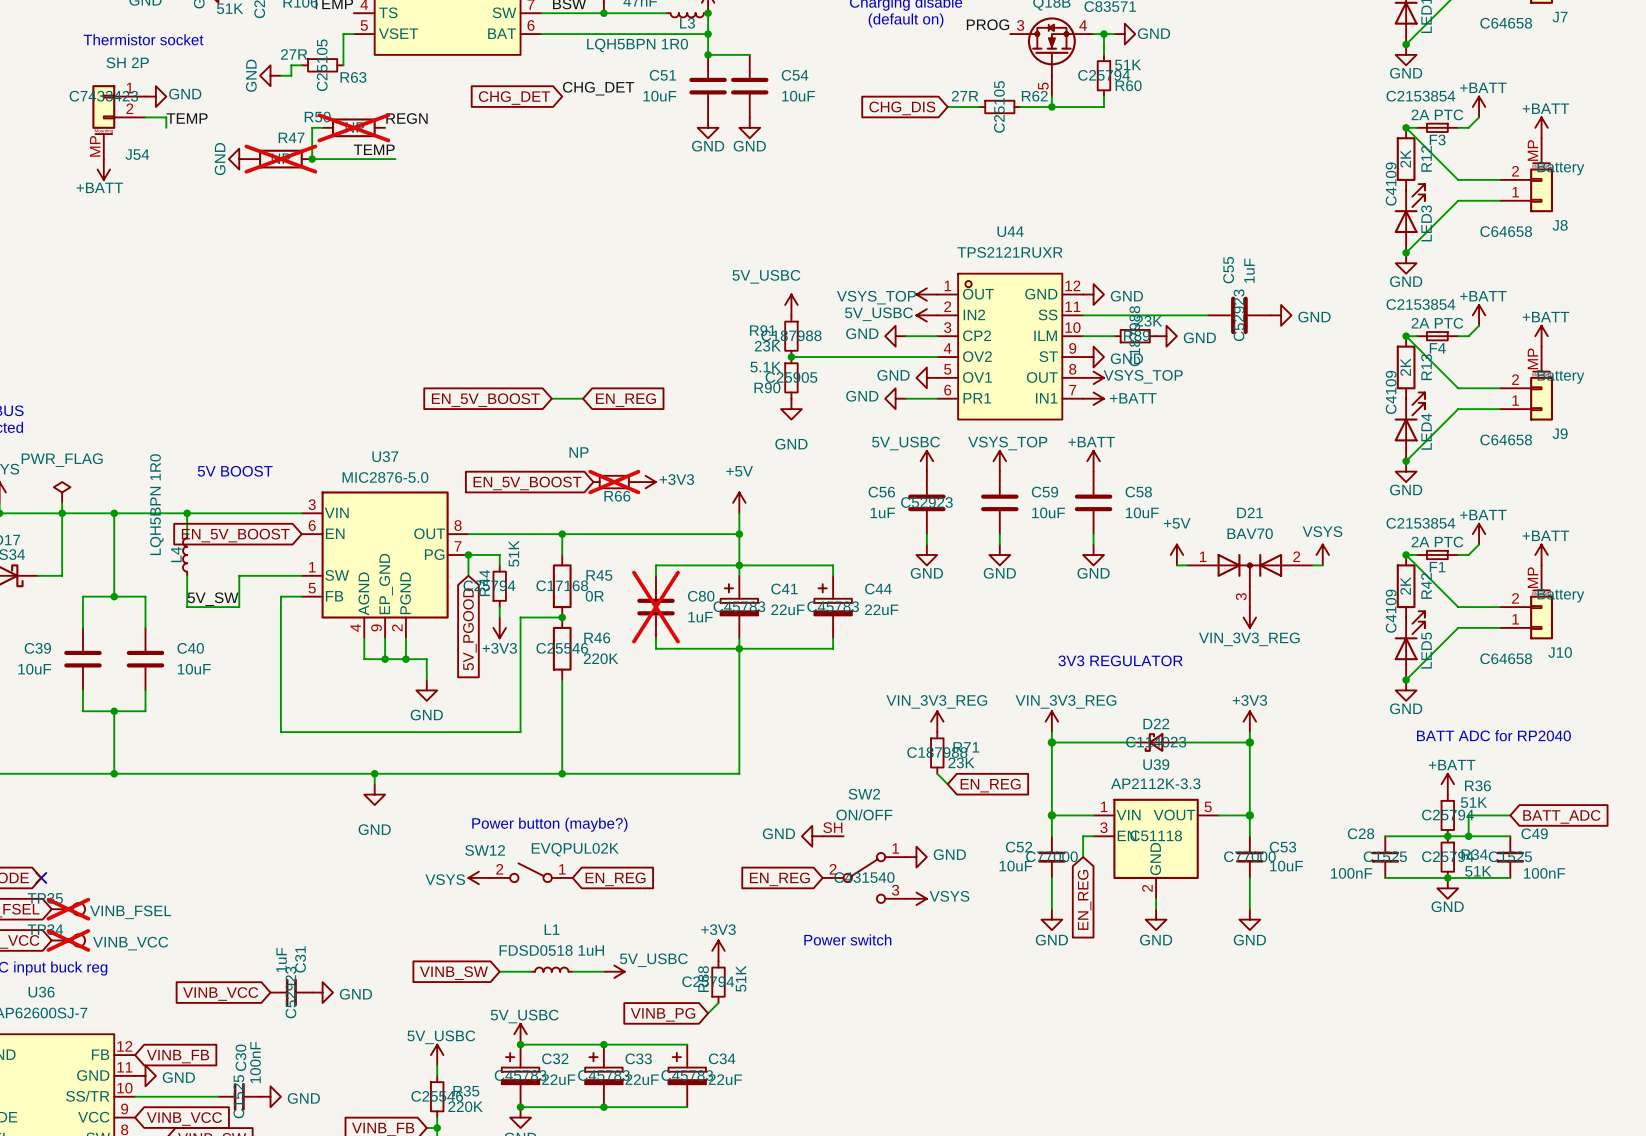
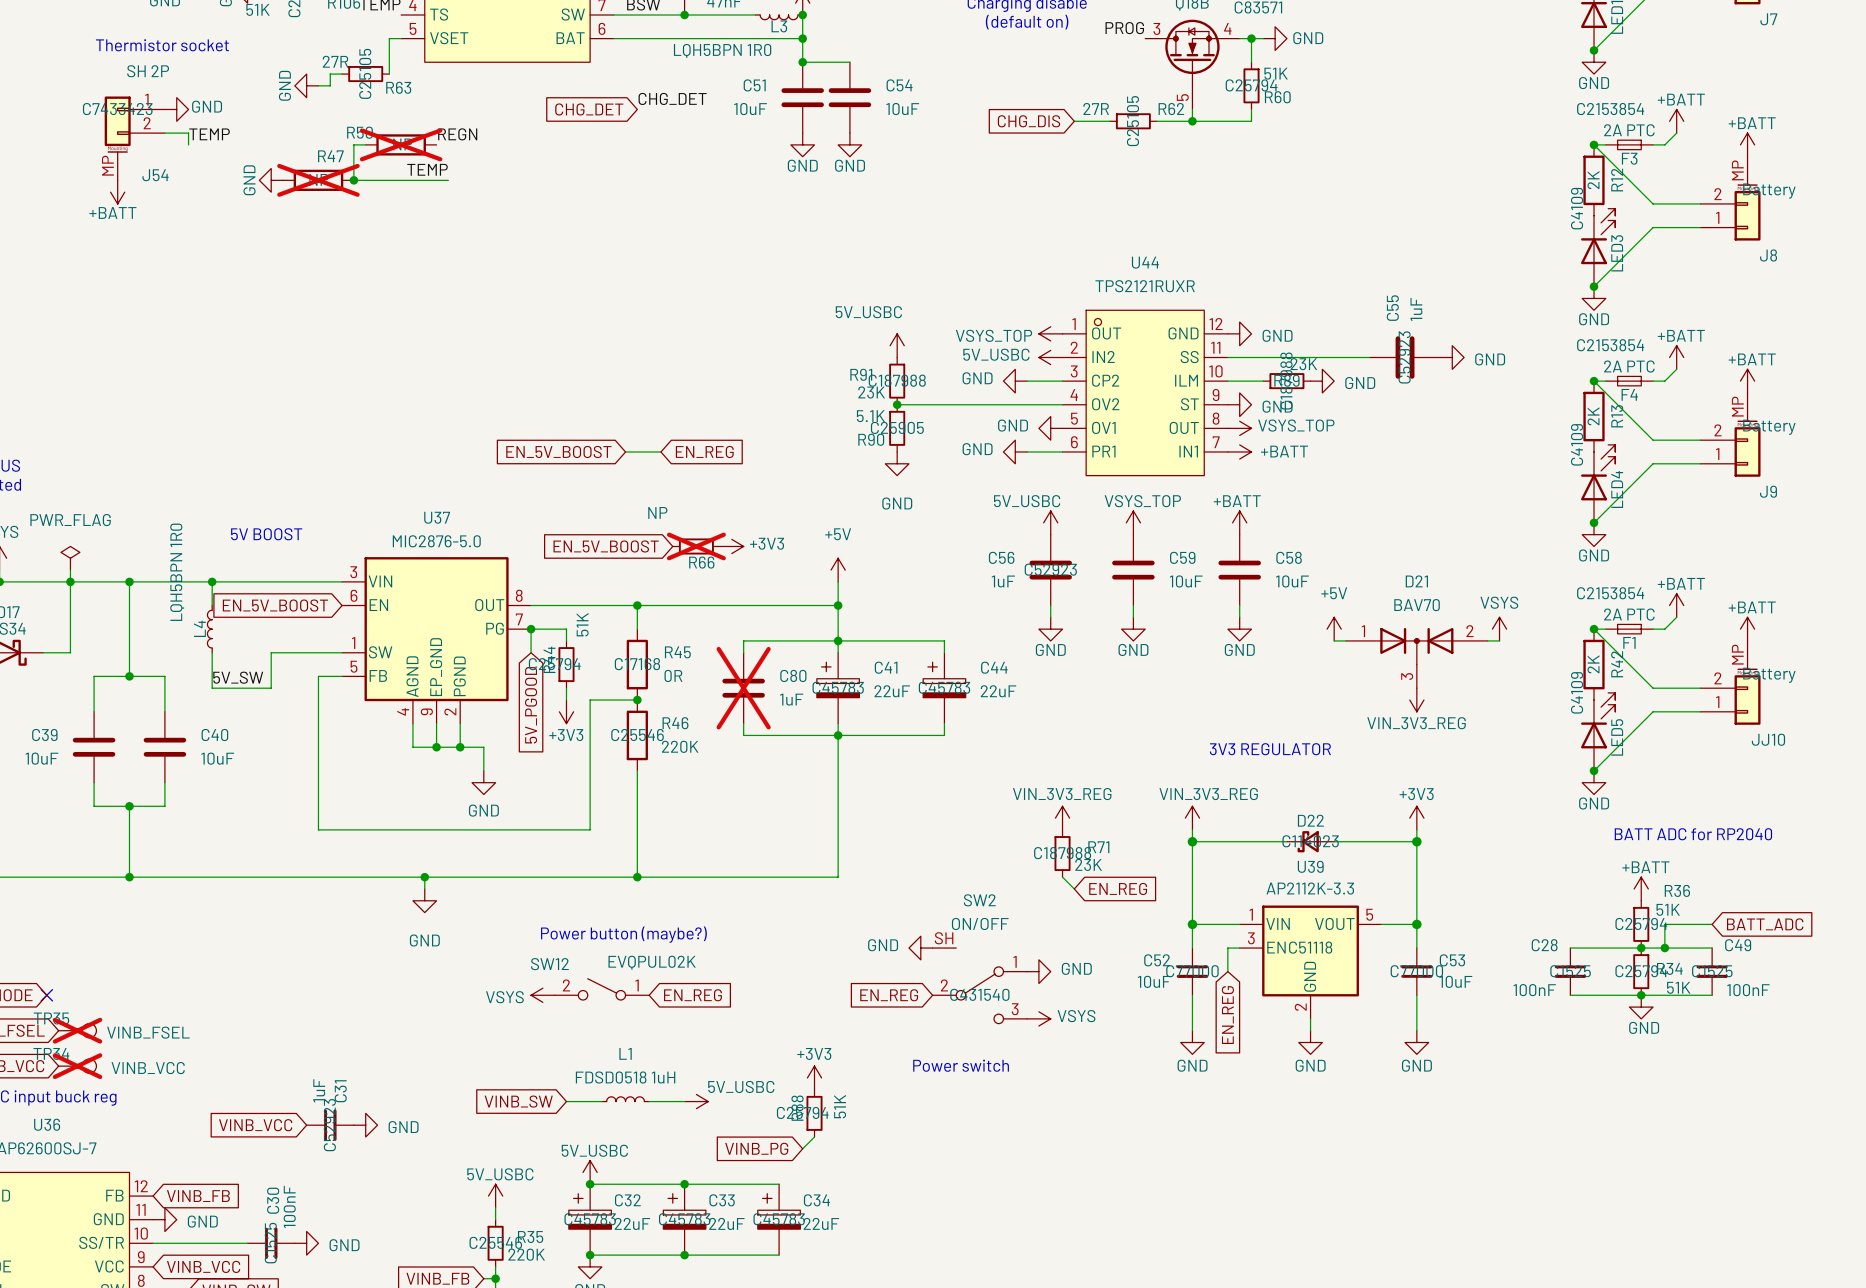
J7 text: C64658 (1506, 23) -> none
J8 text: C64658 (1506, 231) -> none
J9 text: C64658 (1506, 439) -> none
J10 name: J10 (1560, 652) -> JJ10 (1768, 739)
J10 text: C64658 (1506, 658) -> none

